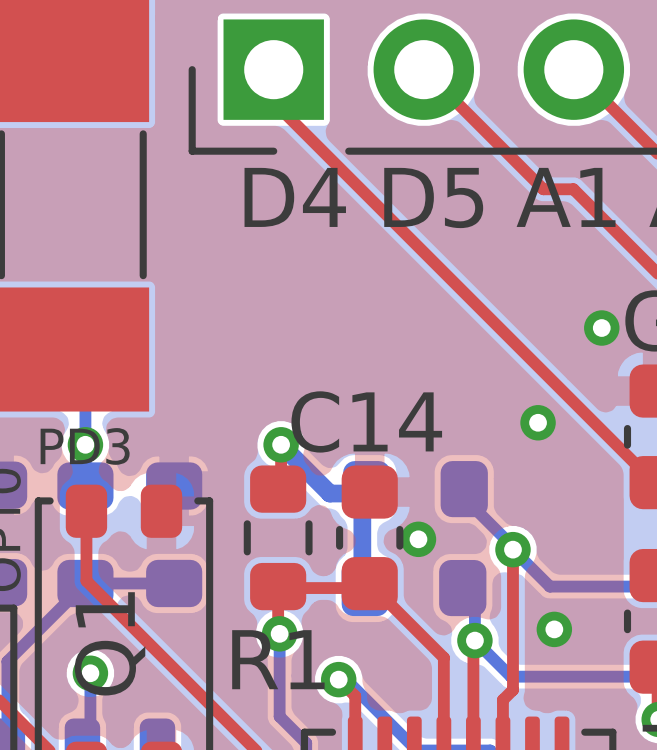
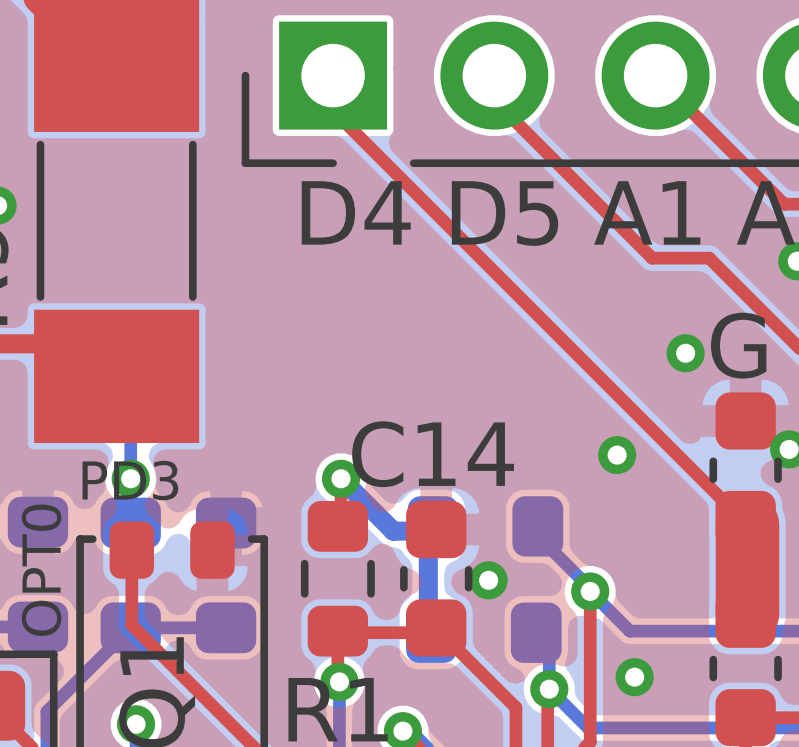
top track: (423, 69) (543, 189) (573, 189) (623, 239) -> (494, 75) (494, 100) (652, 258) (709, 258)

